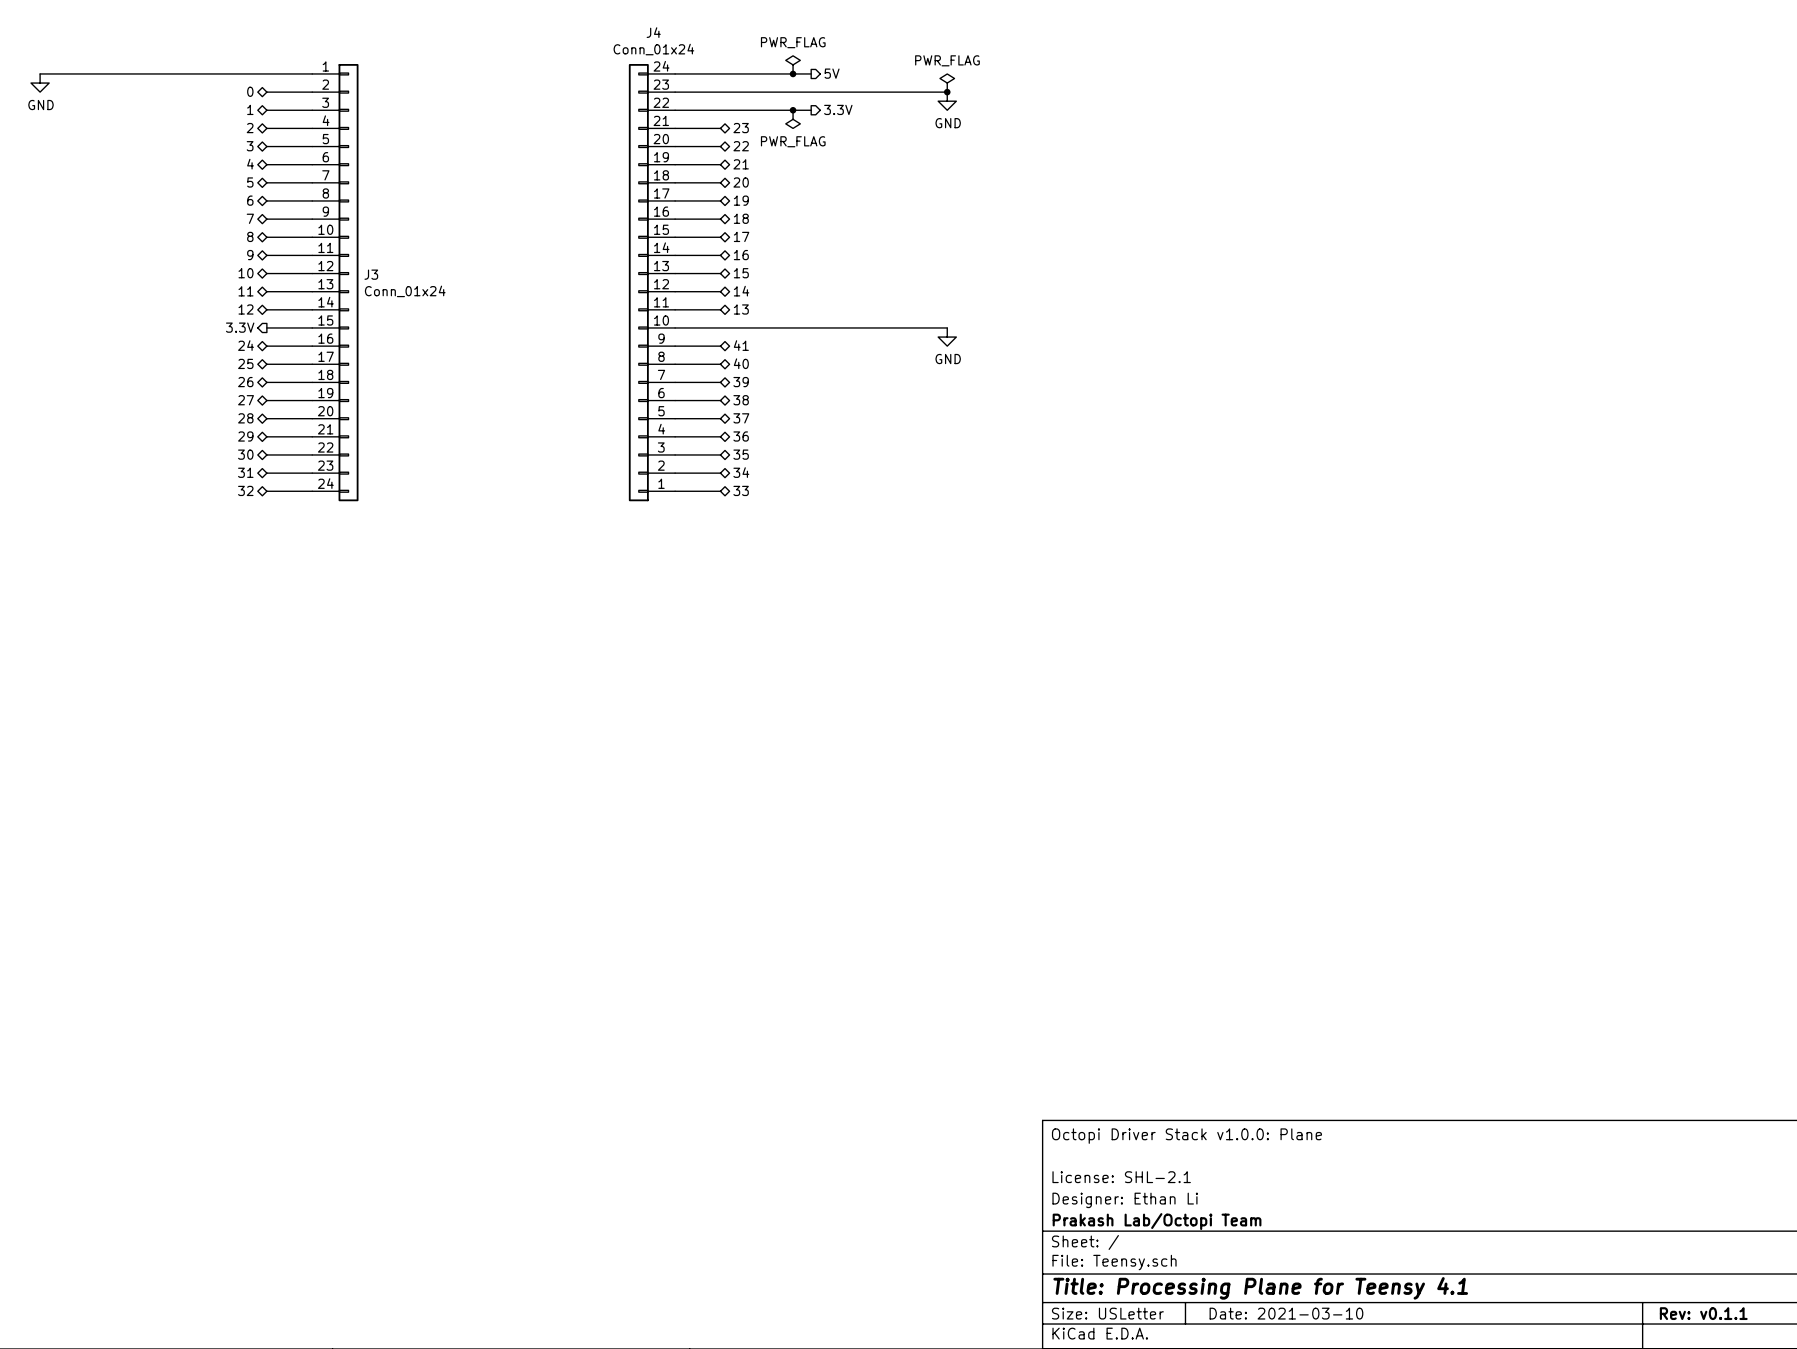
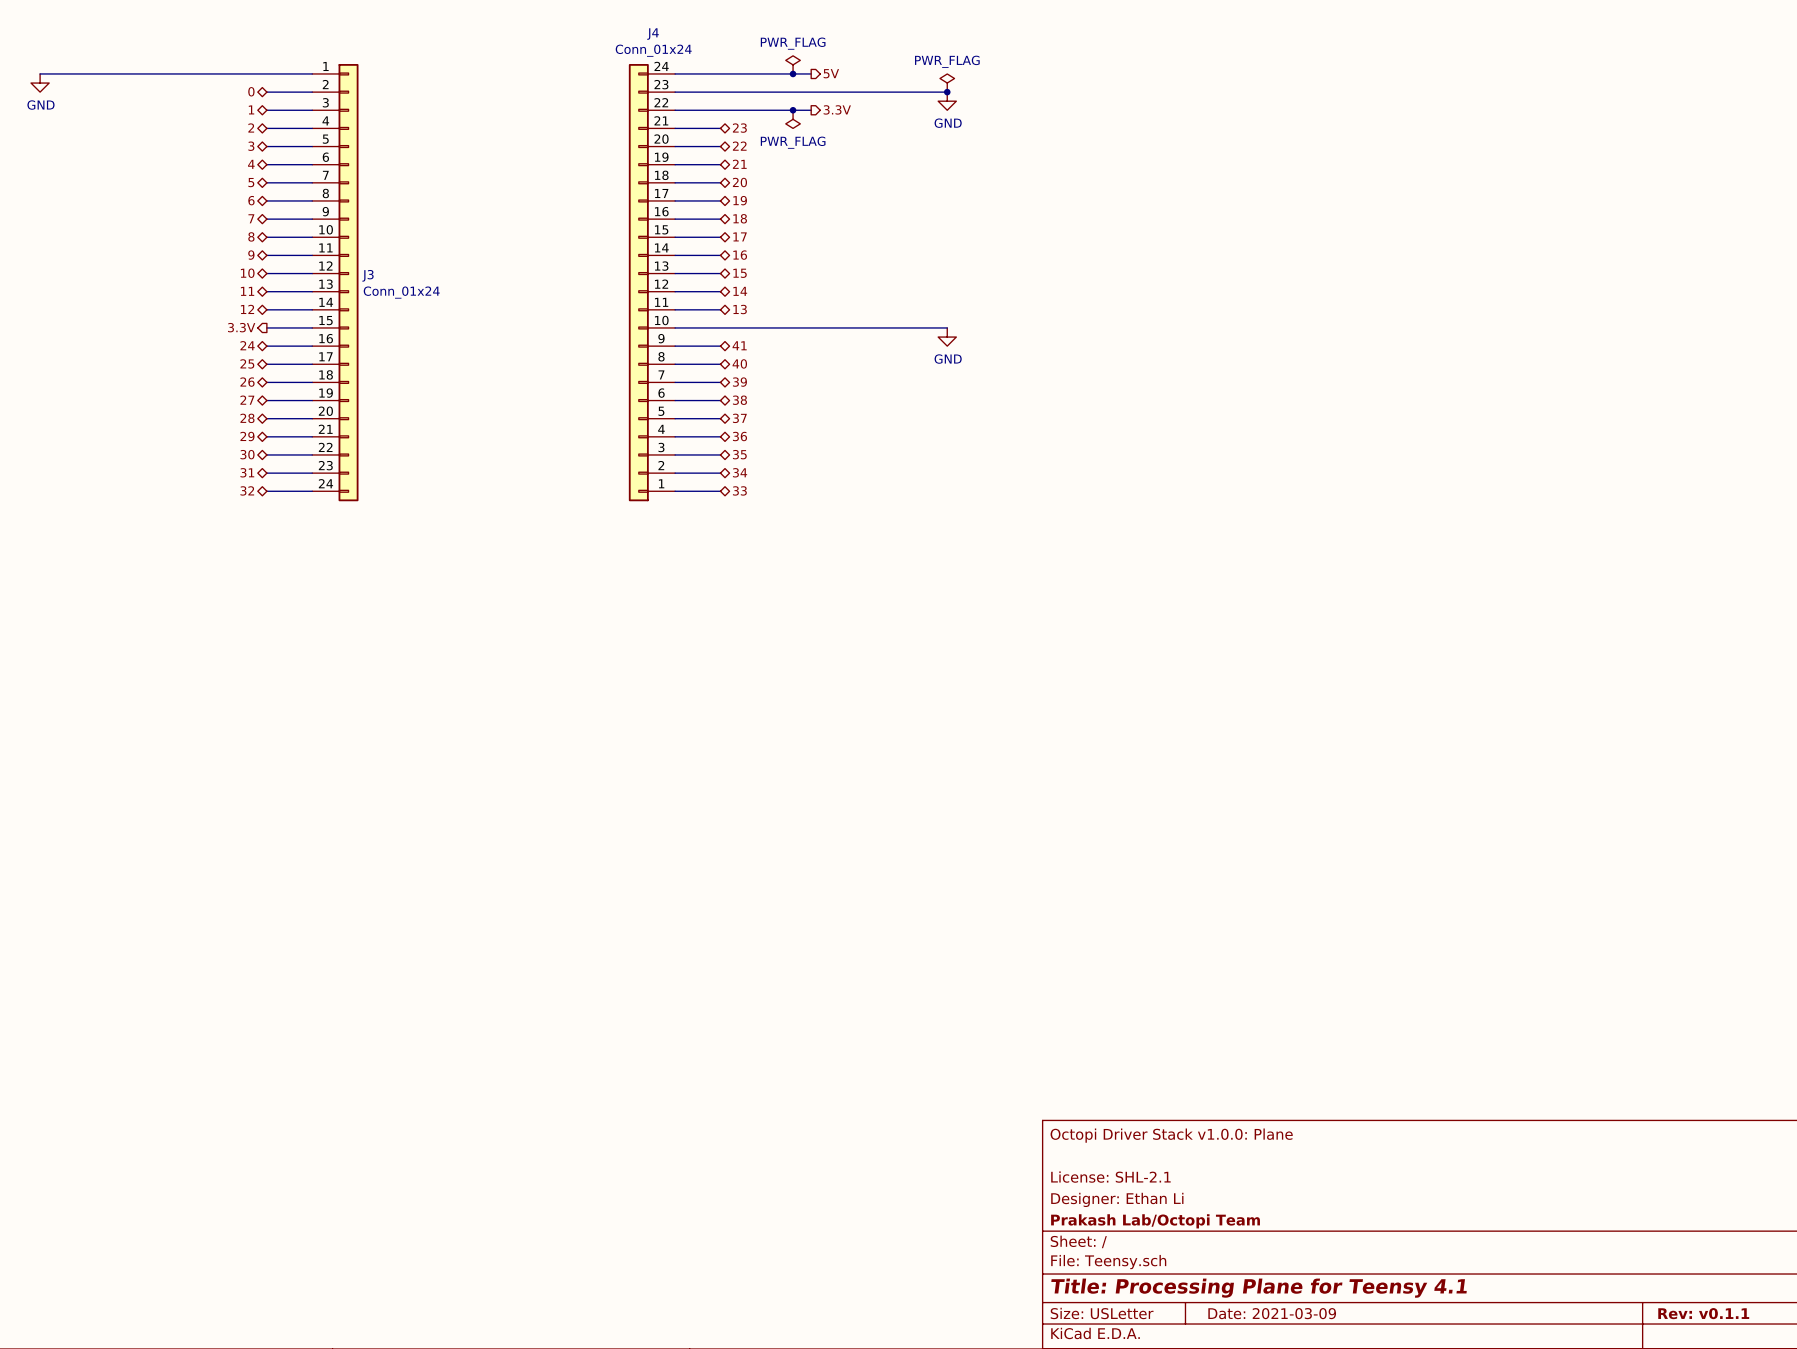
title block: Date: 2021-03-10 (1286, 1313) -> Date: 2021-03-09 (1272, 1313)

